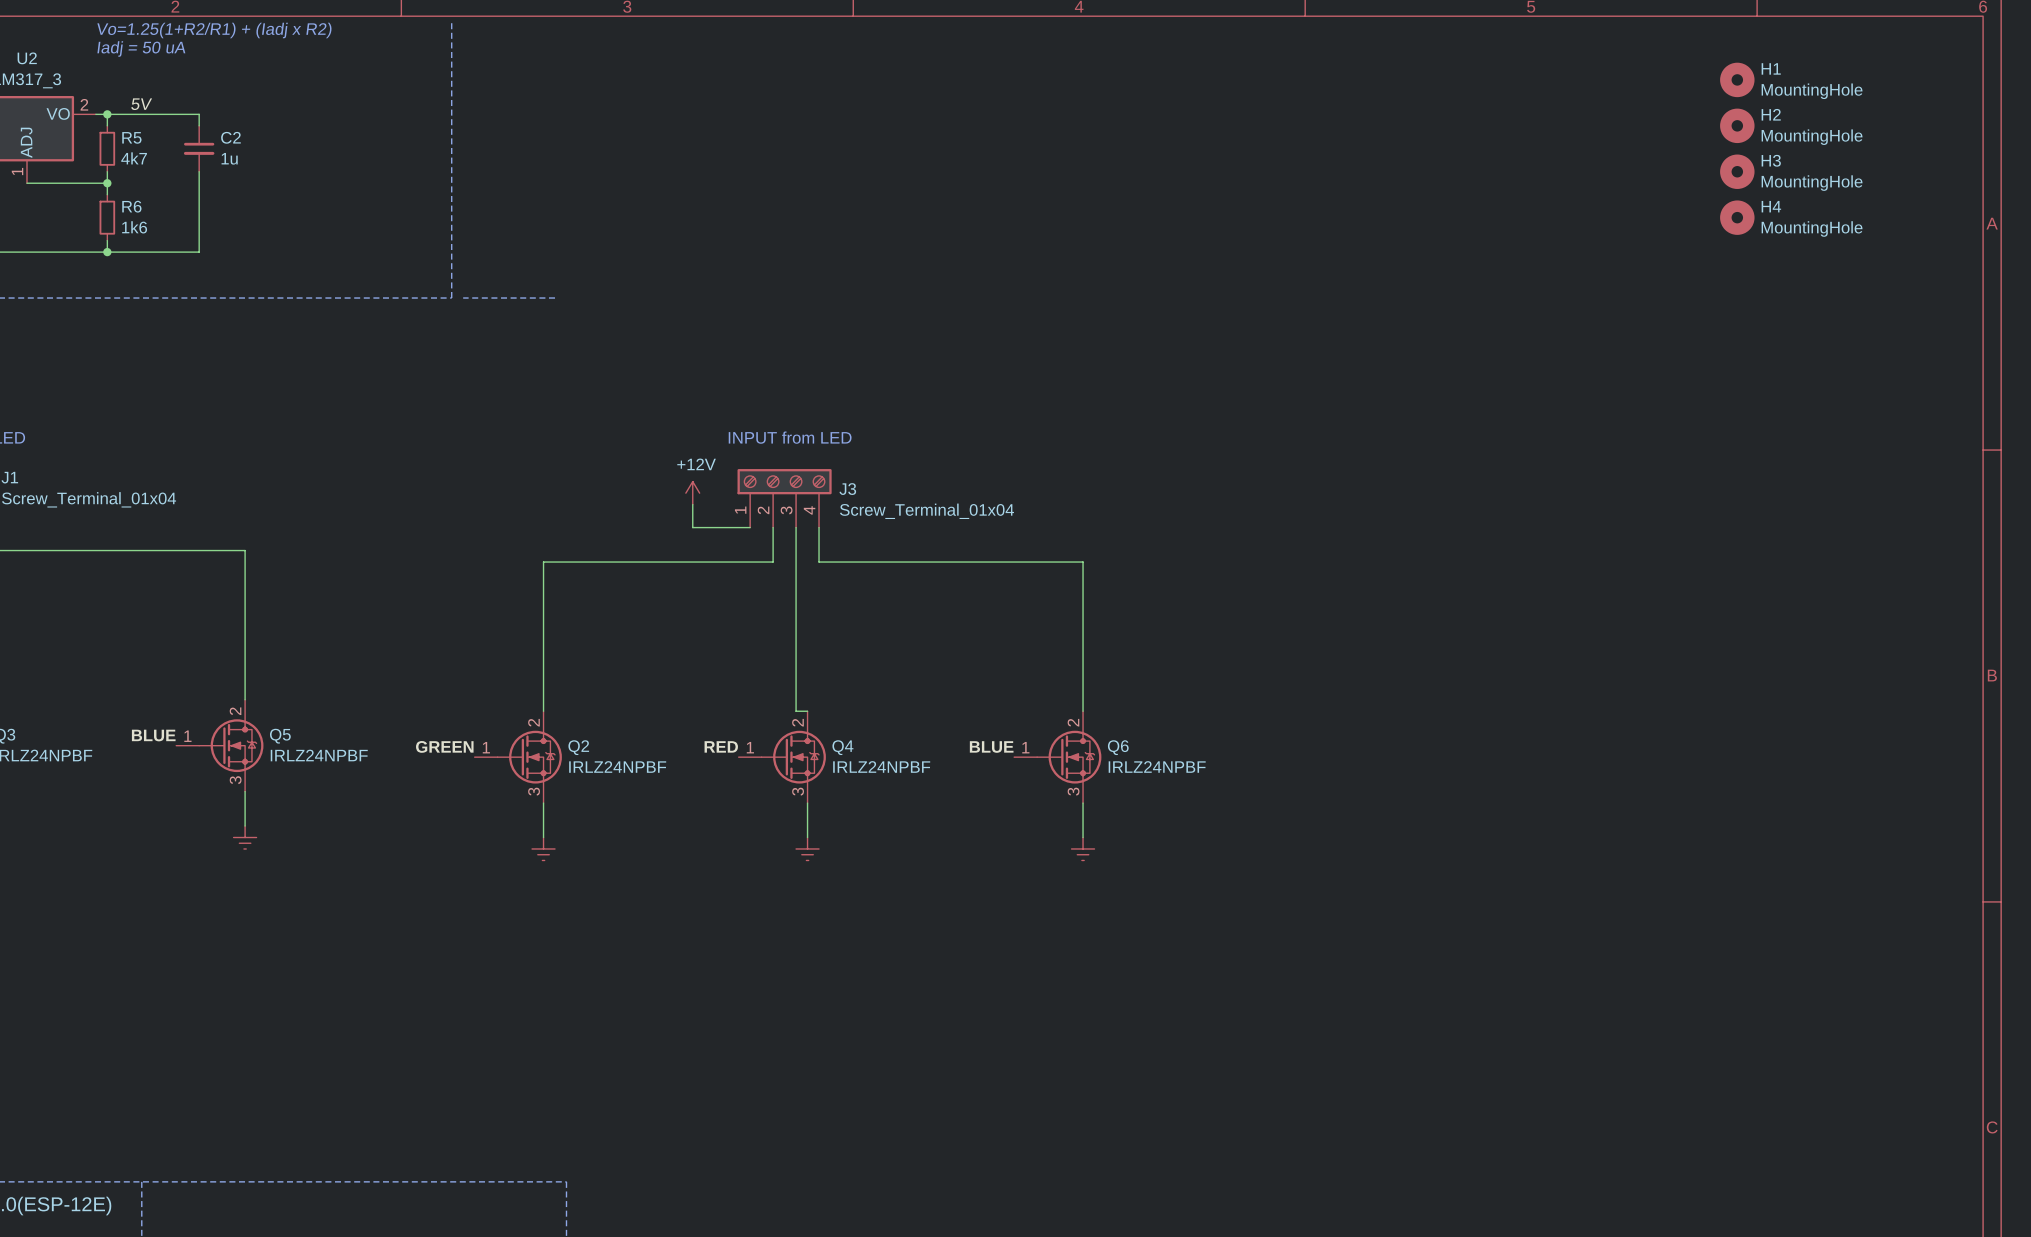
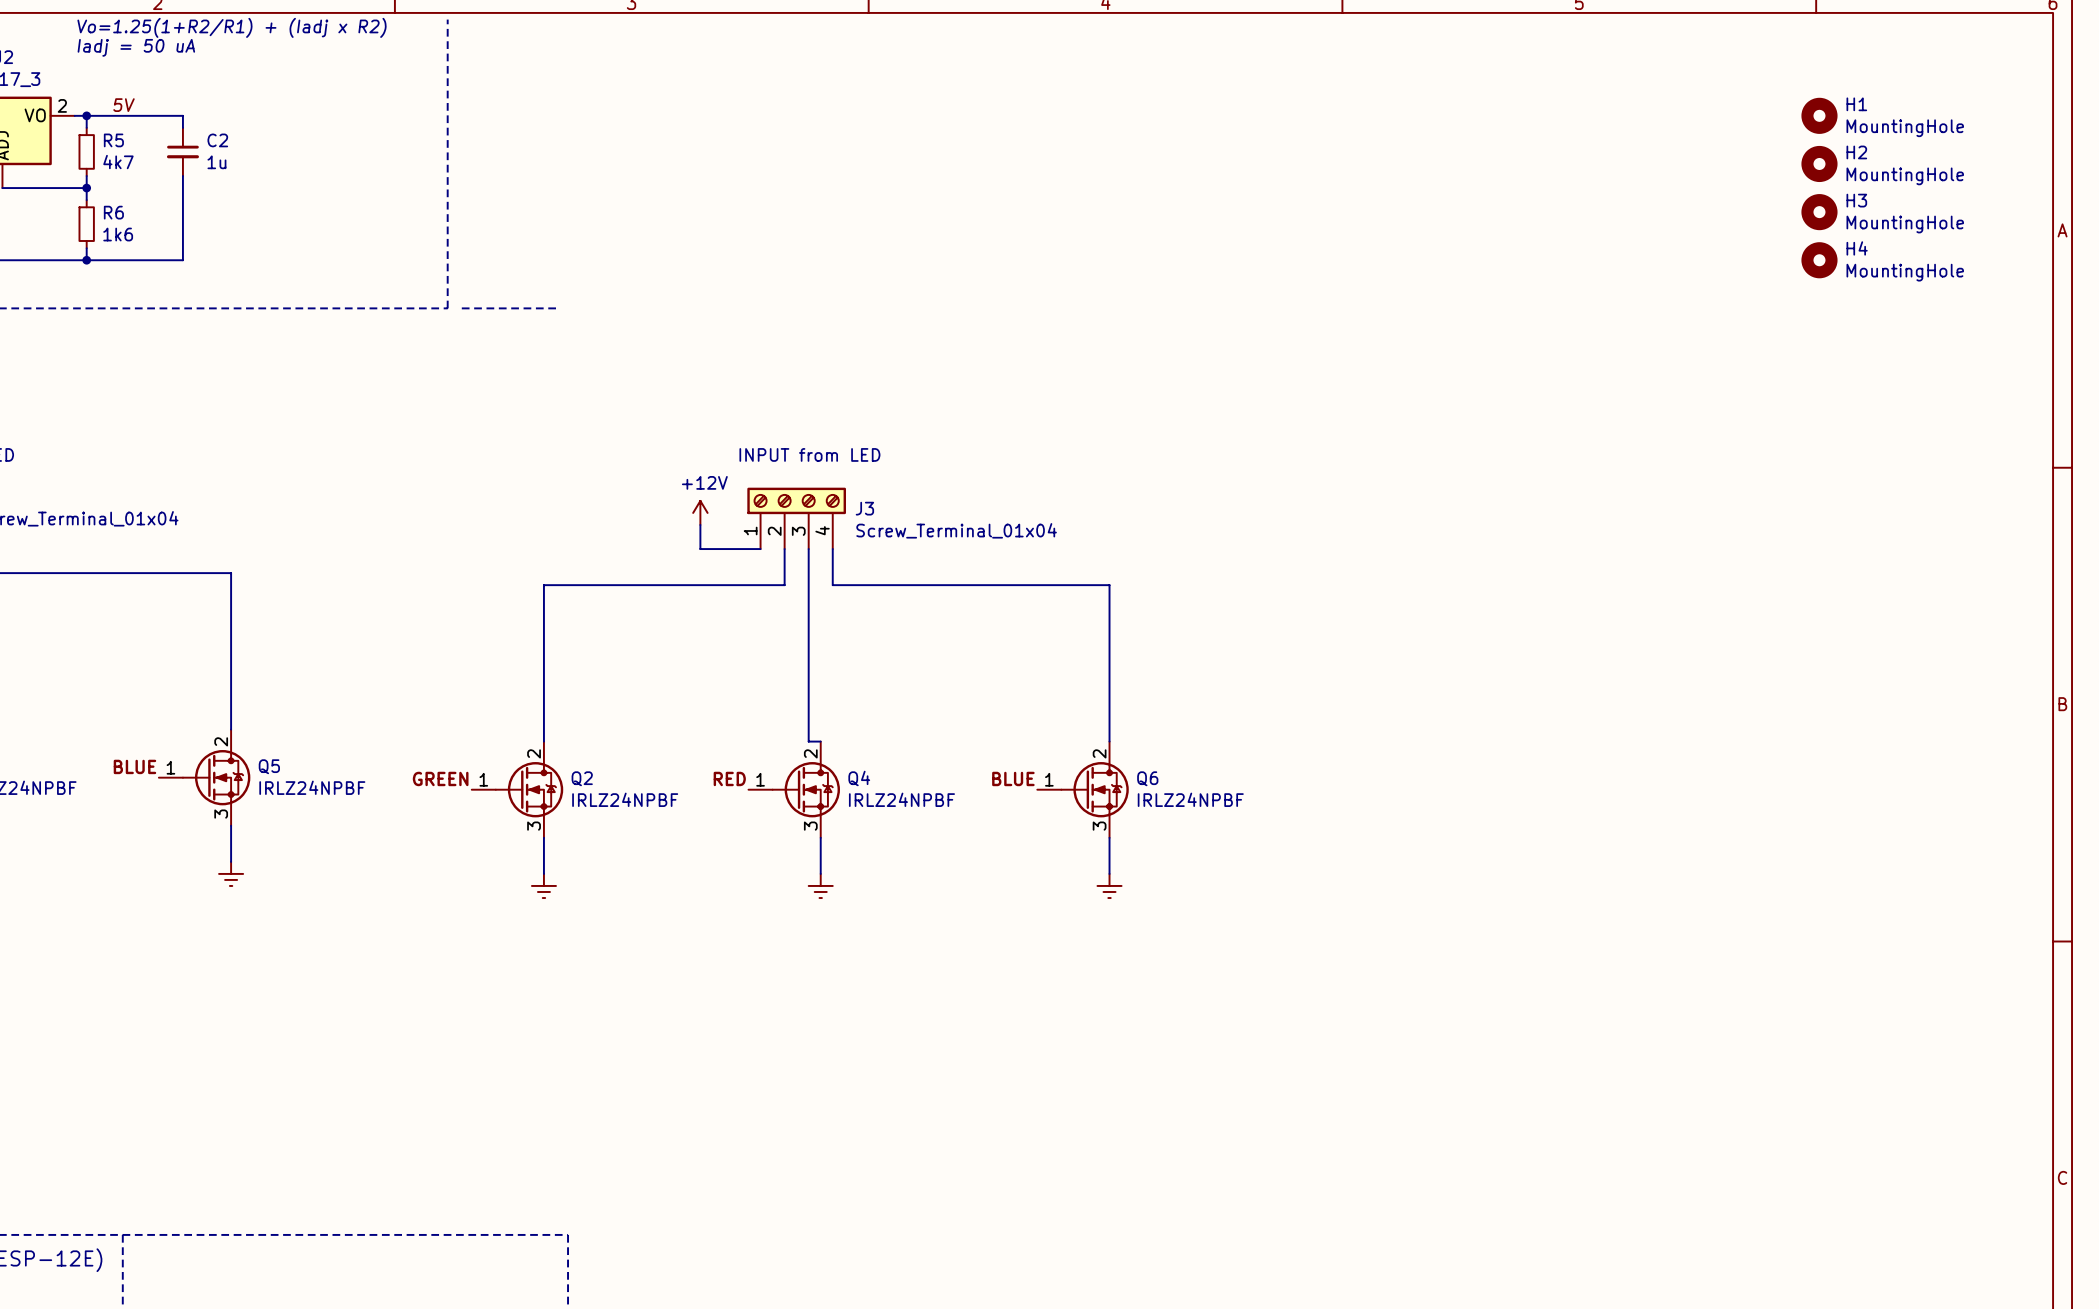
H1 position: (1737, 79) -> (1819, 115)
H2 position: (1737, 125) -> (1819, 163)
H3 position: (1737, 171) -> (1819, 212)
H4 position: (1737, 217) -> (1819, 260)

